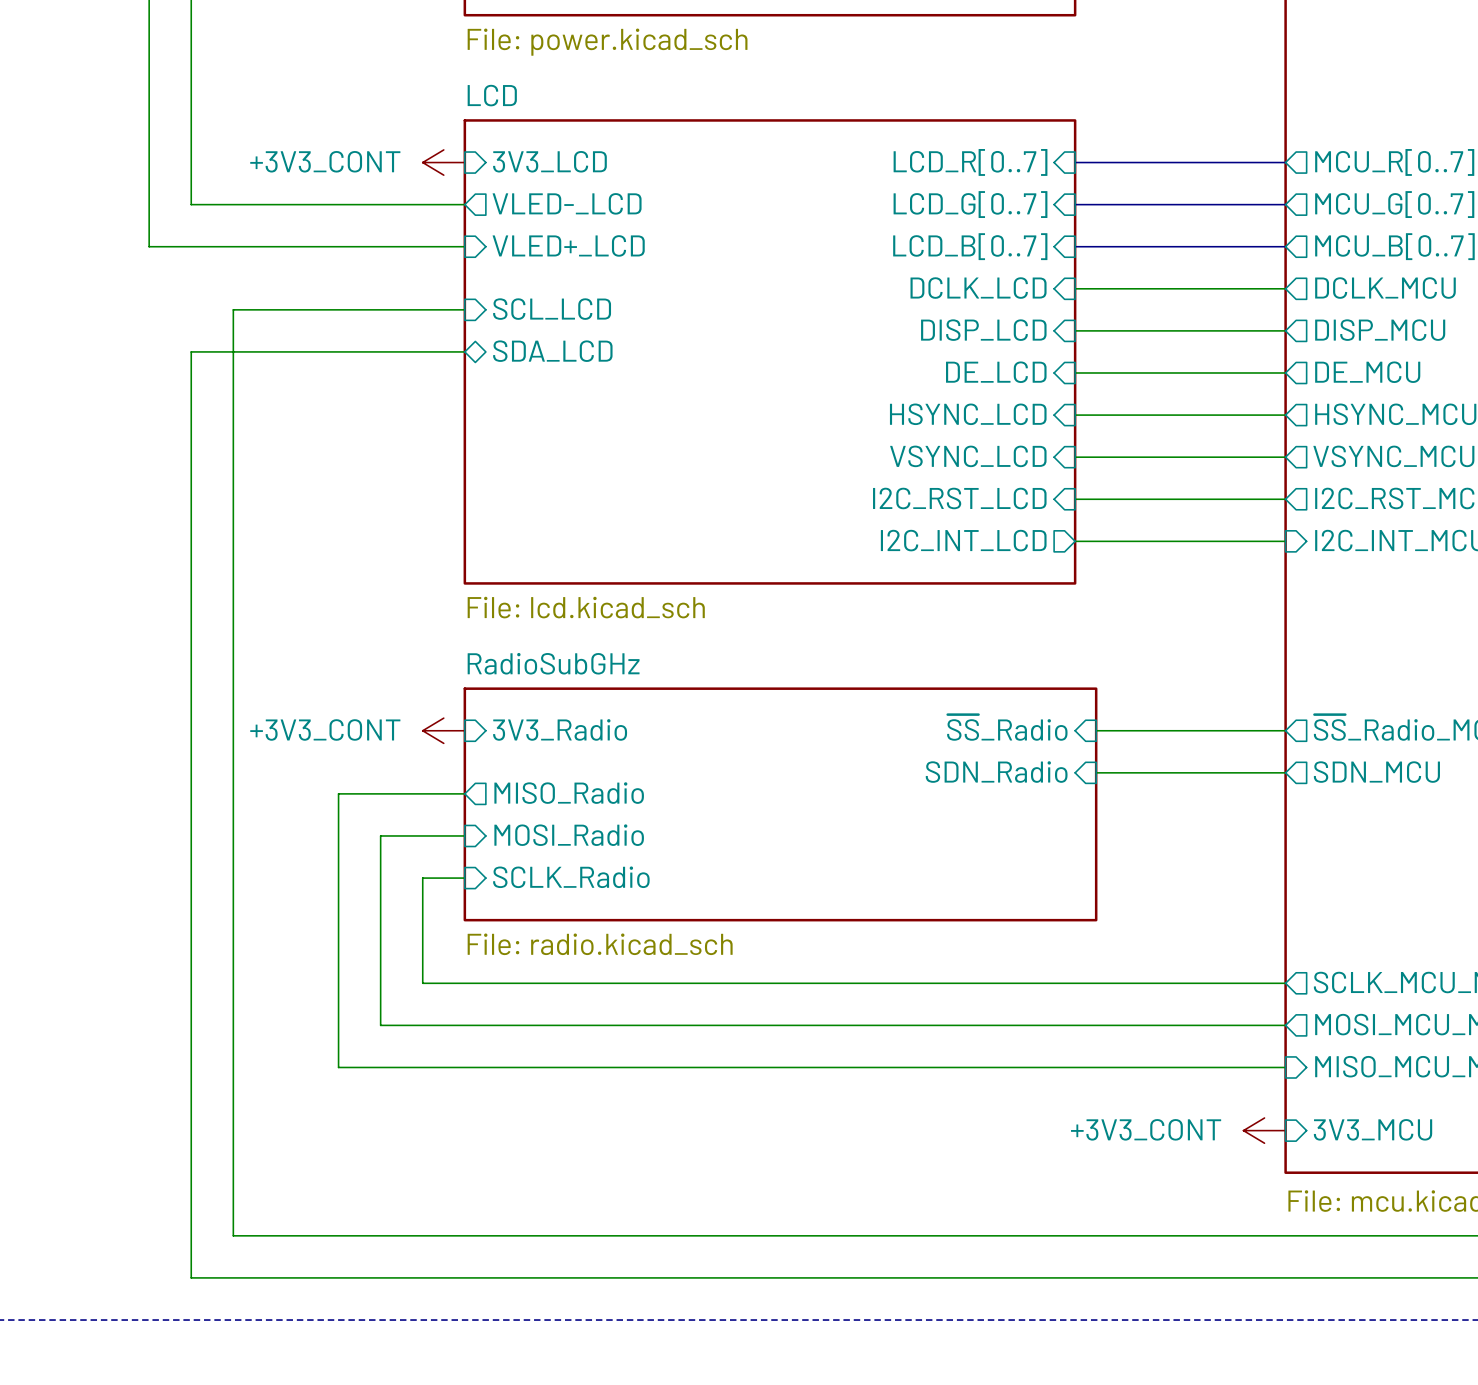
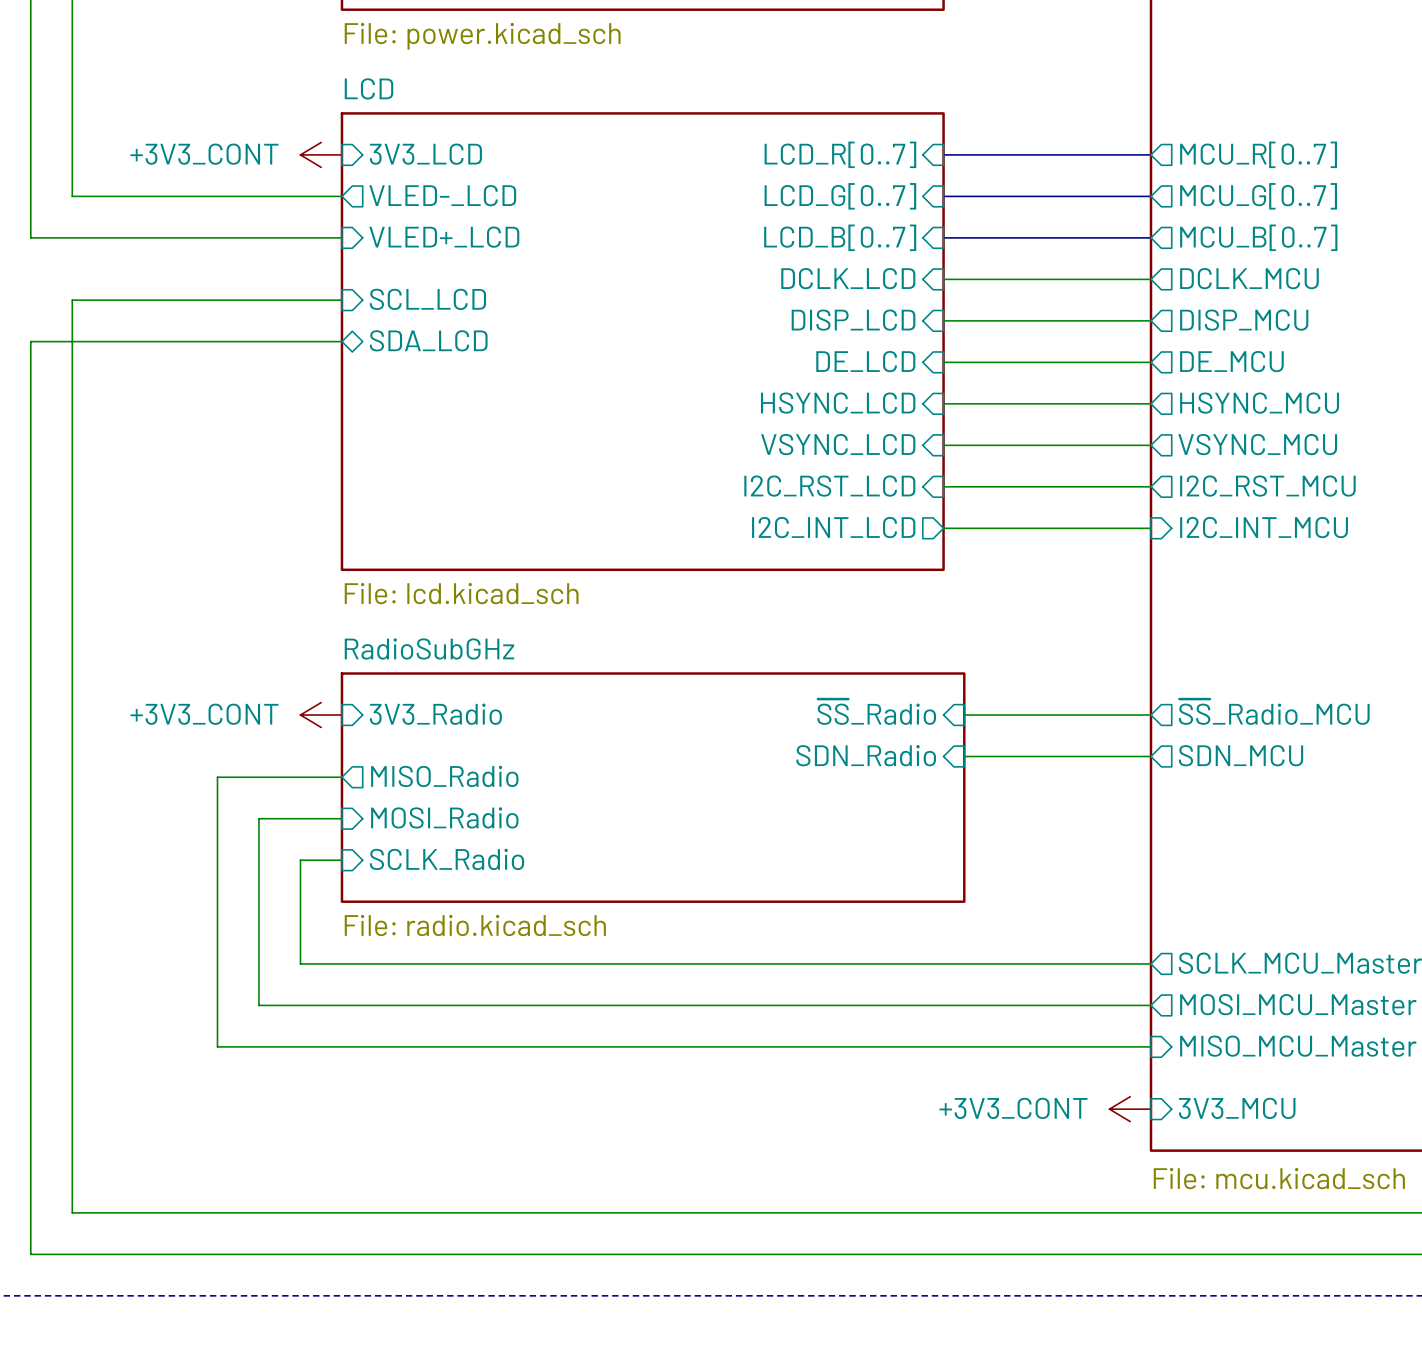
wire: (233, 309) (233, 1235) -> (113, 300) (72, 300) (72, 341) (30, 341) (30, 1254) (72, 1254)
wire: (191, 1235) (191, 1277) -> (72, 1212) (113, 1212)

